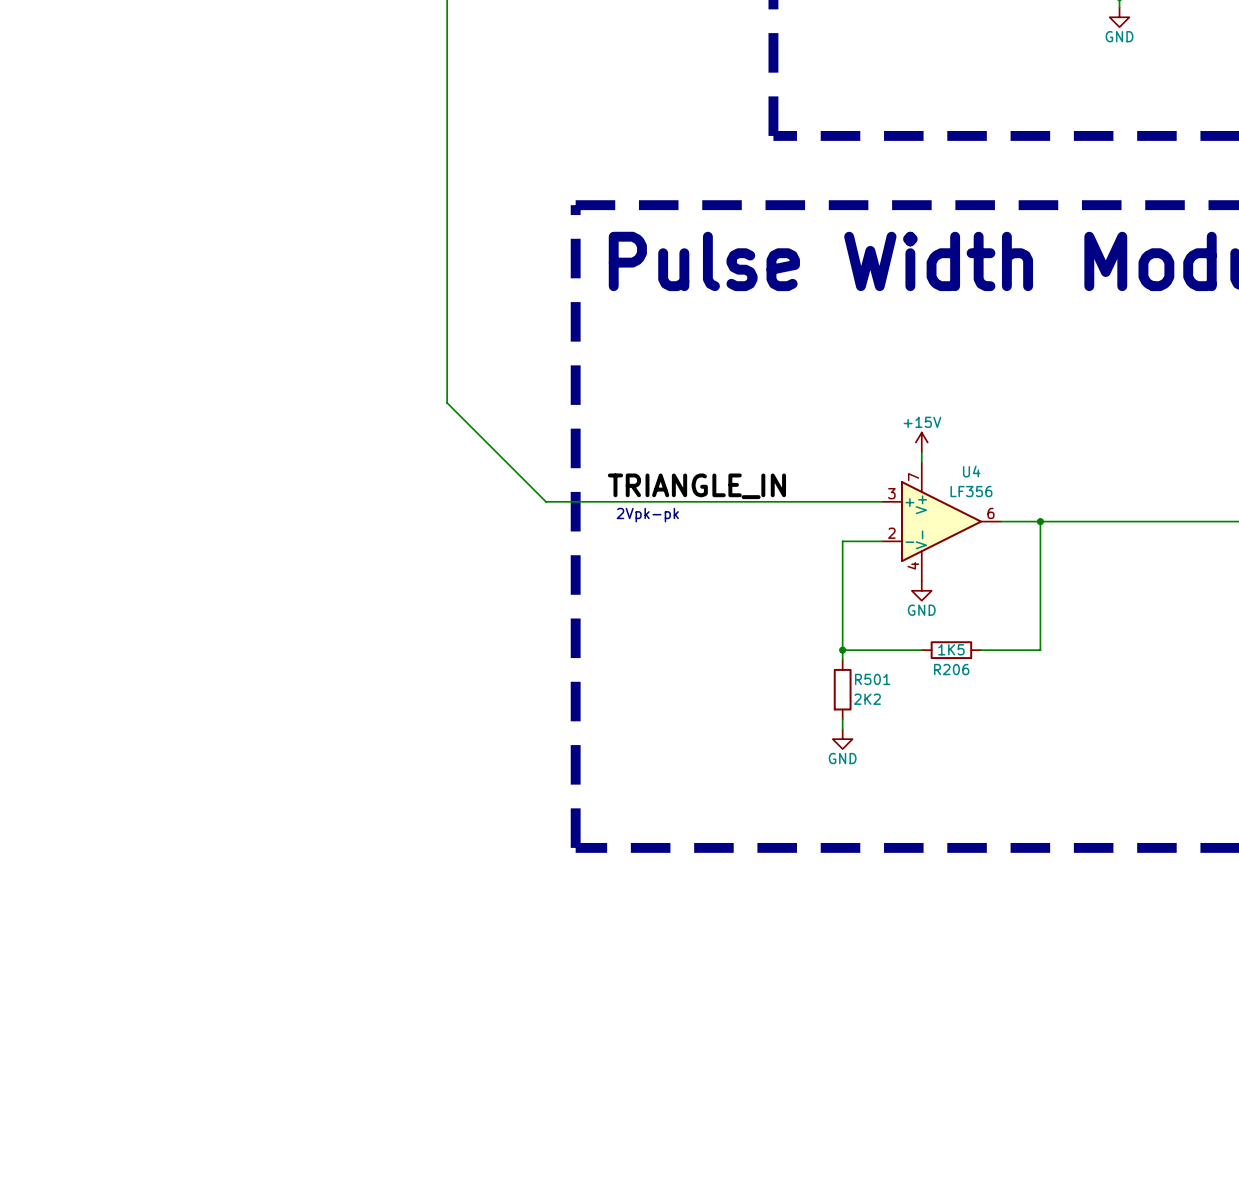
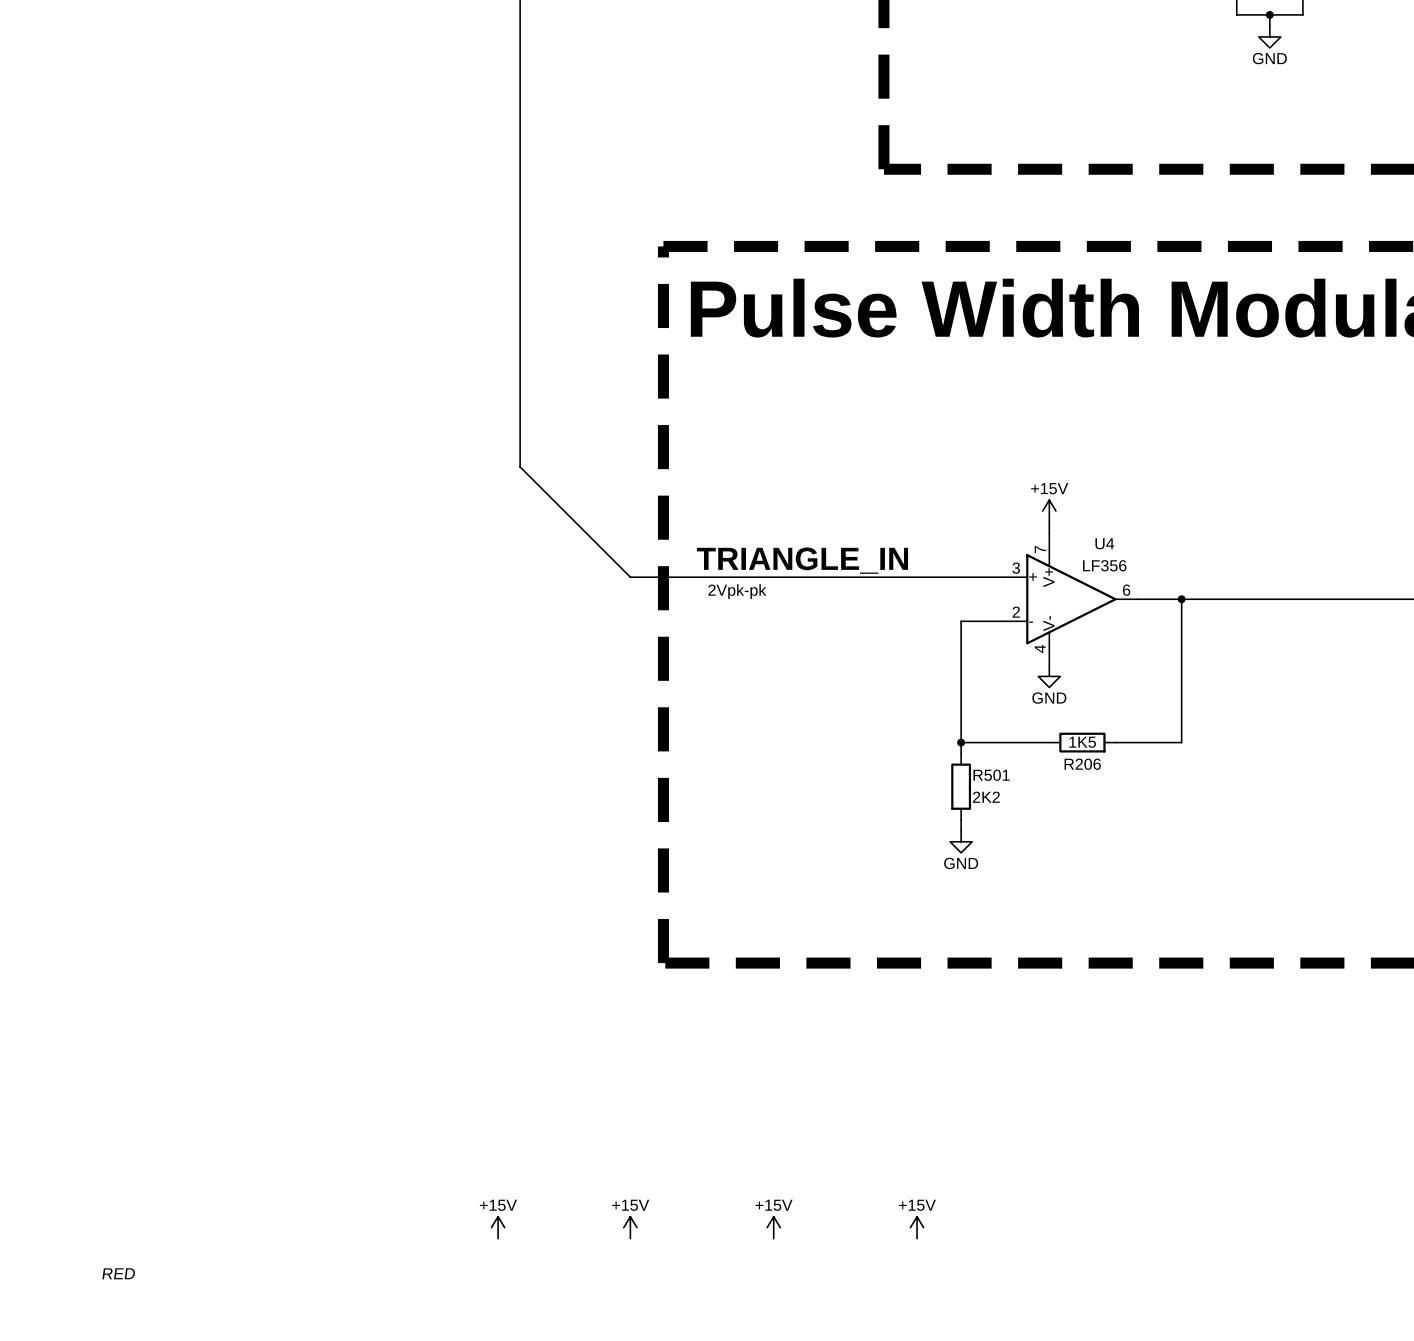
power symbol: none -> +15V (498, 1227)
power symbol: none -> +15V (630, 1227)
power symbol: none -> +15V (773, 1227)
power symbol: none -> +15V (917, 1227)
text: none -> RED (118, 1273)

